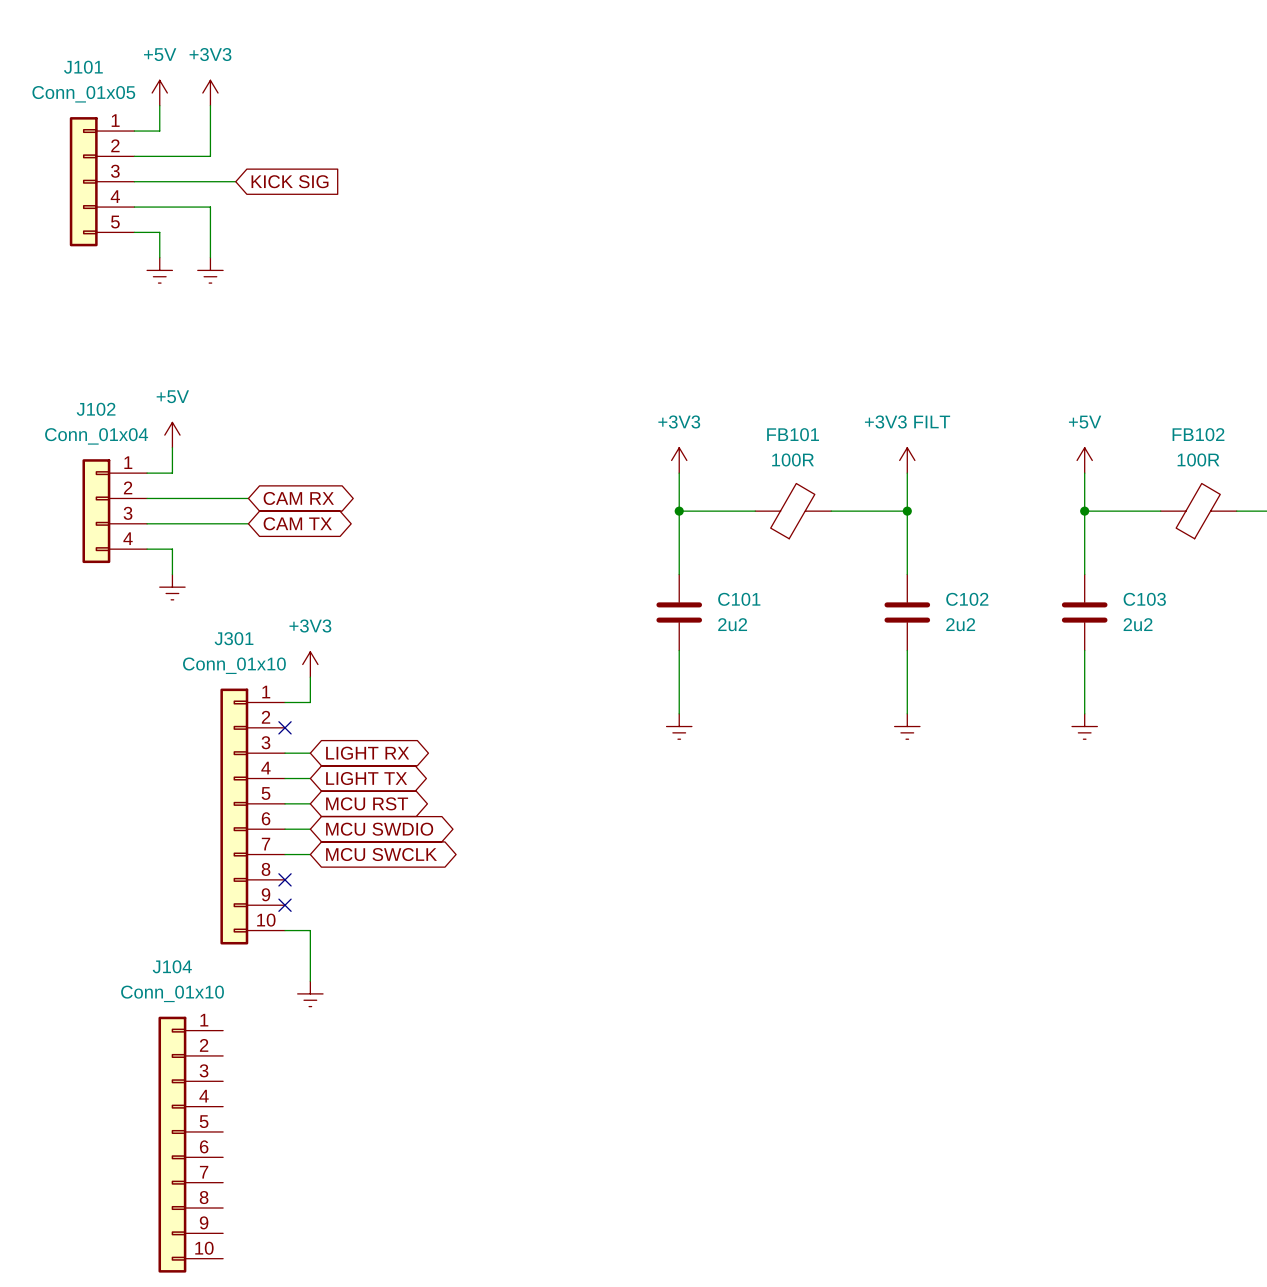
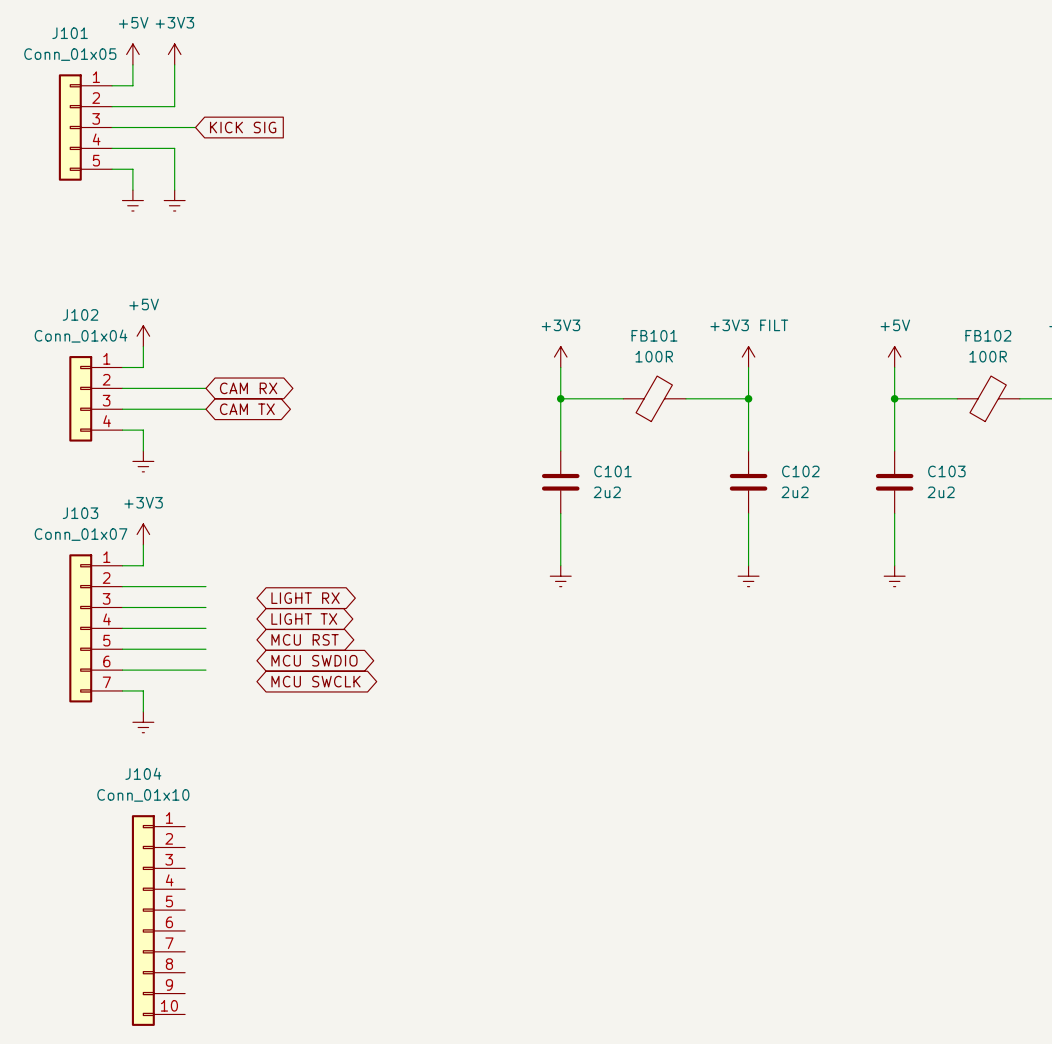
power symbol position: +3V3 (310, 664) -> +3V3 (143, 534)
wire: (310, 677) (310, 702) (285, 702) -> (143, 544) (143, 565) (122, 565)
no-connect mark: (285, 727) -> none
wire: none -> (122, 586) (205, 586)
wire: (285, 753) (310, 753) -> none
wire: none -> (122, 607) (205, 607)
wire: (285, 778) (310, 778) -> none
J103: none -> Conn_01x07 (95, 628)
wire: none -> (122, 628) (205, 628)
wire: (285, 803) (310, 803) -> none
wire: none -> (122, 649) (205, 649)
J301: Conn_01x10 (252, 816) -> none
wire: (285, 829) (310, 829) -> none
wire: none -> (122, 670) (205, 670)
wire: (285, 854) (310, 854) -> none
wire: none -> (122, 690) (143, 690) (143, 711)
no-connect mark: (285, 879) -> none
no-connect mark: (285, 905) -> none
wire: (285, 930) (310, 930) (310, 981) -> none
power symbol position: (310, 993) -> (143, 722)

